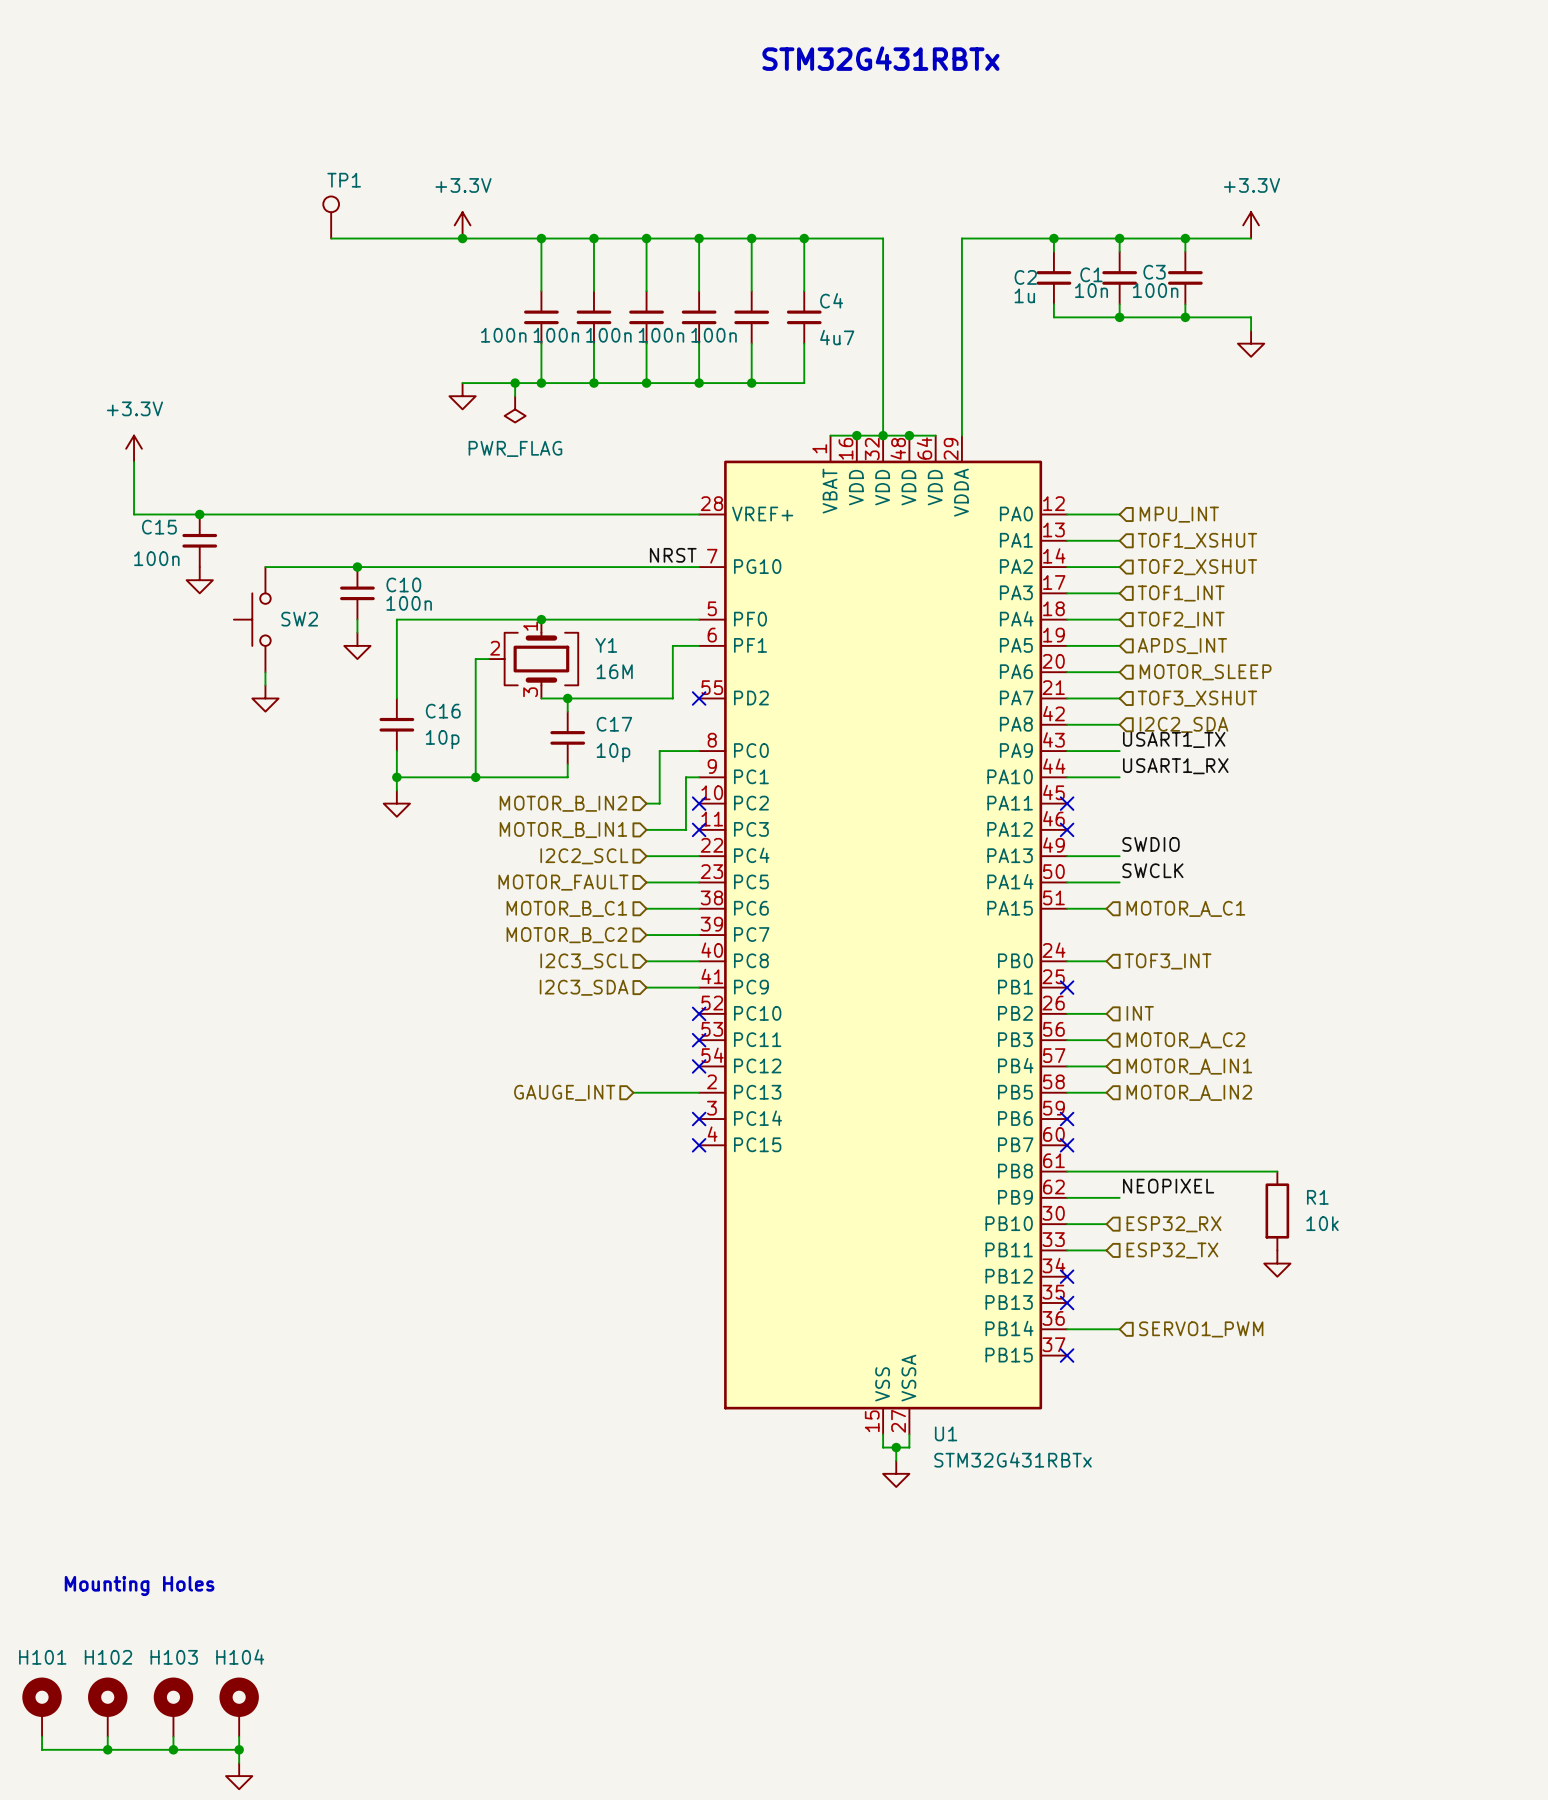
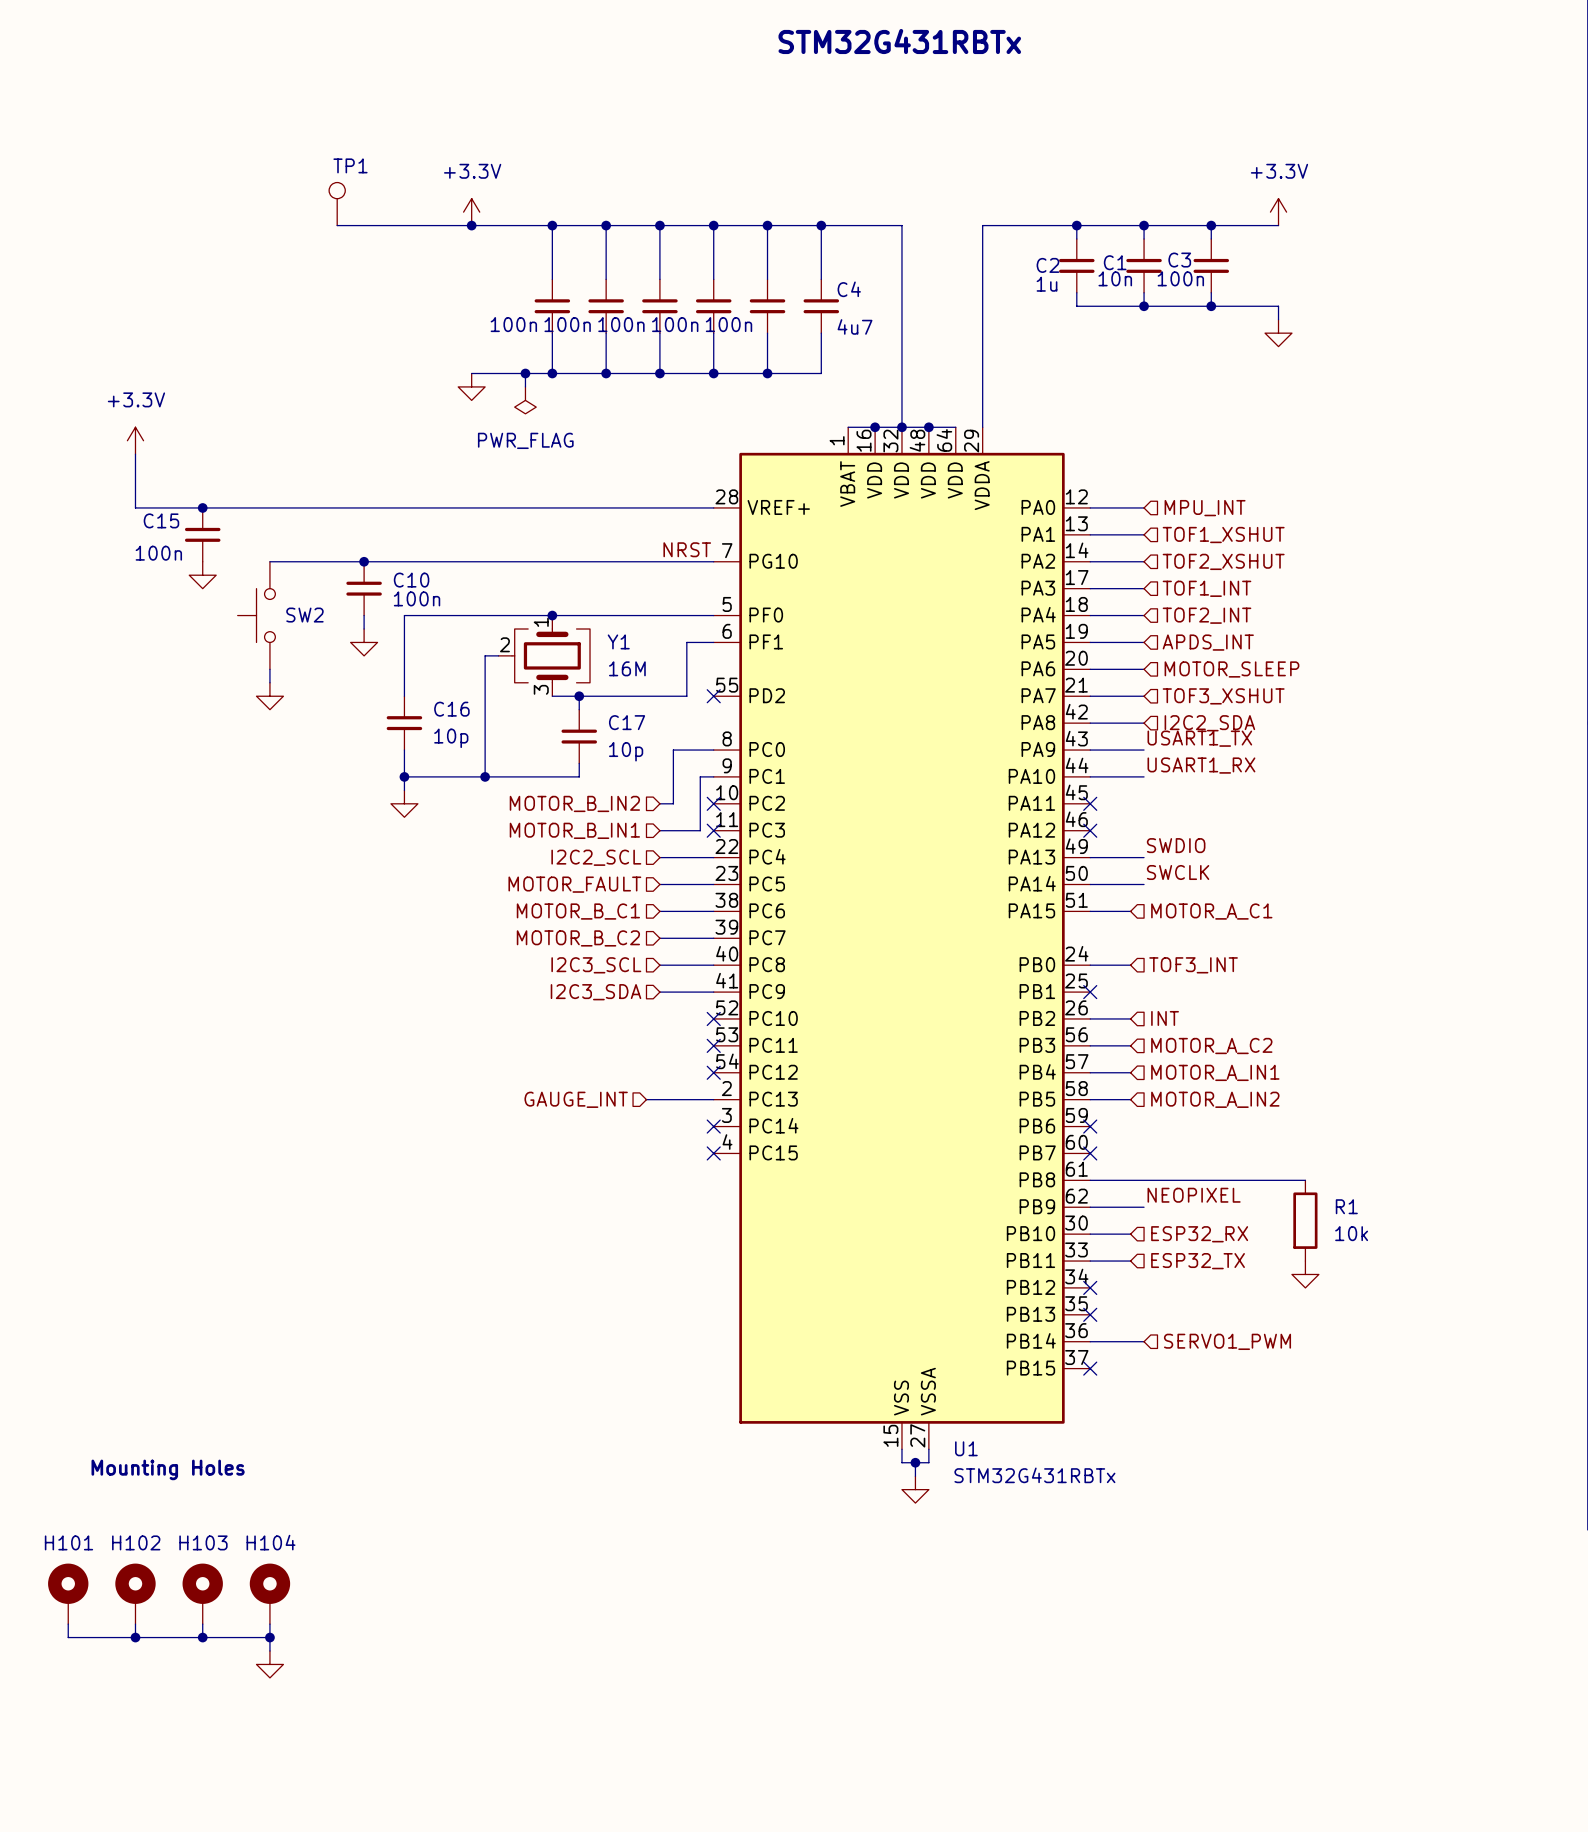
text position: Mounting Holes (139, 1585) -> Mounting Holes (168, 1469)
junction: none -> (135, 1637)
junction: none -> (202, 1637)
junction: none -> (269, 1637)
H101 position: (42, 1707) -> (68, 1593)
H102 position: (107, 1707) -> (135, 1593)
H103 position: (173, 1707) -> (202, 1593)
H104 position: (239, 1707) -> (269, 1593)
wire: (42, 1736) (42, 1749) (239, 1749) -> (68, 1624) (68, 1637) (269, 1637)
wire: (107, 1736) (107, 1749) -> (135, 1624) (135, 1637)
wire: (173, 1736) (173, 1749) -> (202, 1624) (202, 1637)
wire: (239, 1736) (239, 1762) -> (269, 1624) (269, 1651)
junction: (107, 1749) -> none
junction: (173, 1749) -> none
junction: (239, 1749) -> none
power symbol position: (239, 1776) -> (269, 1664)

